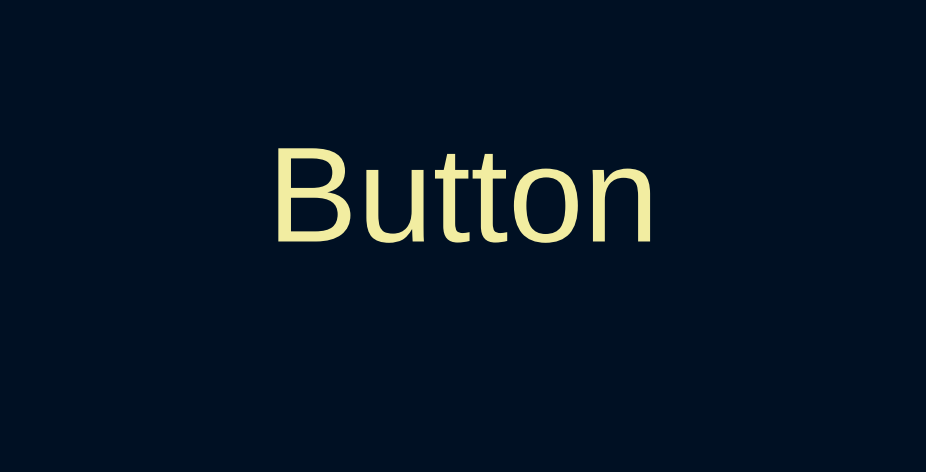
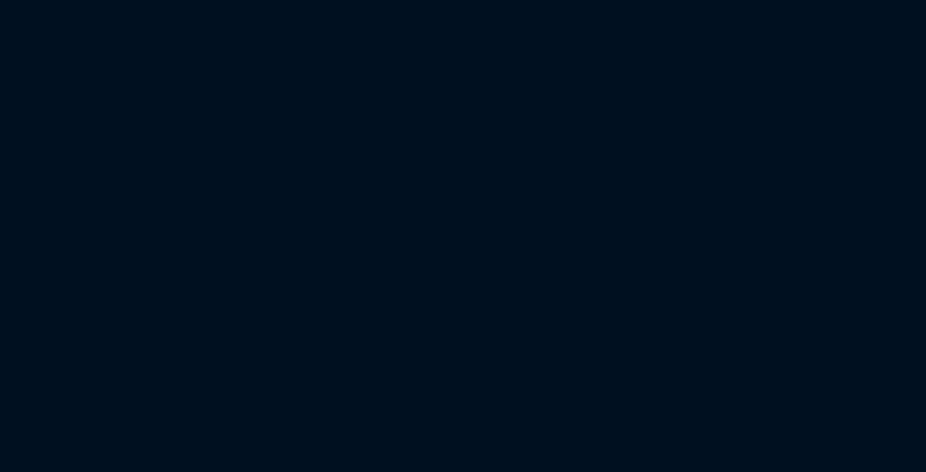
text: Button (464, 195) -> none

